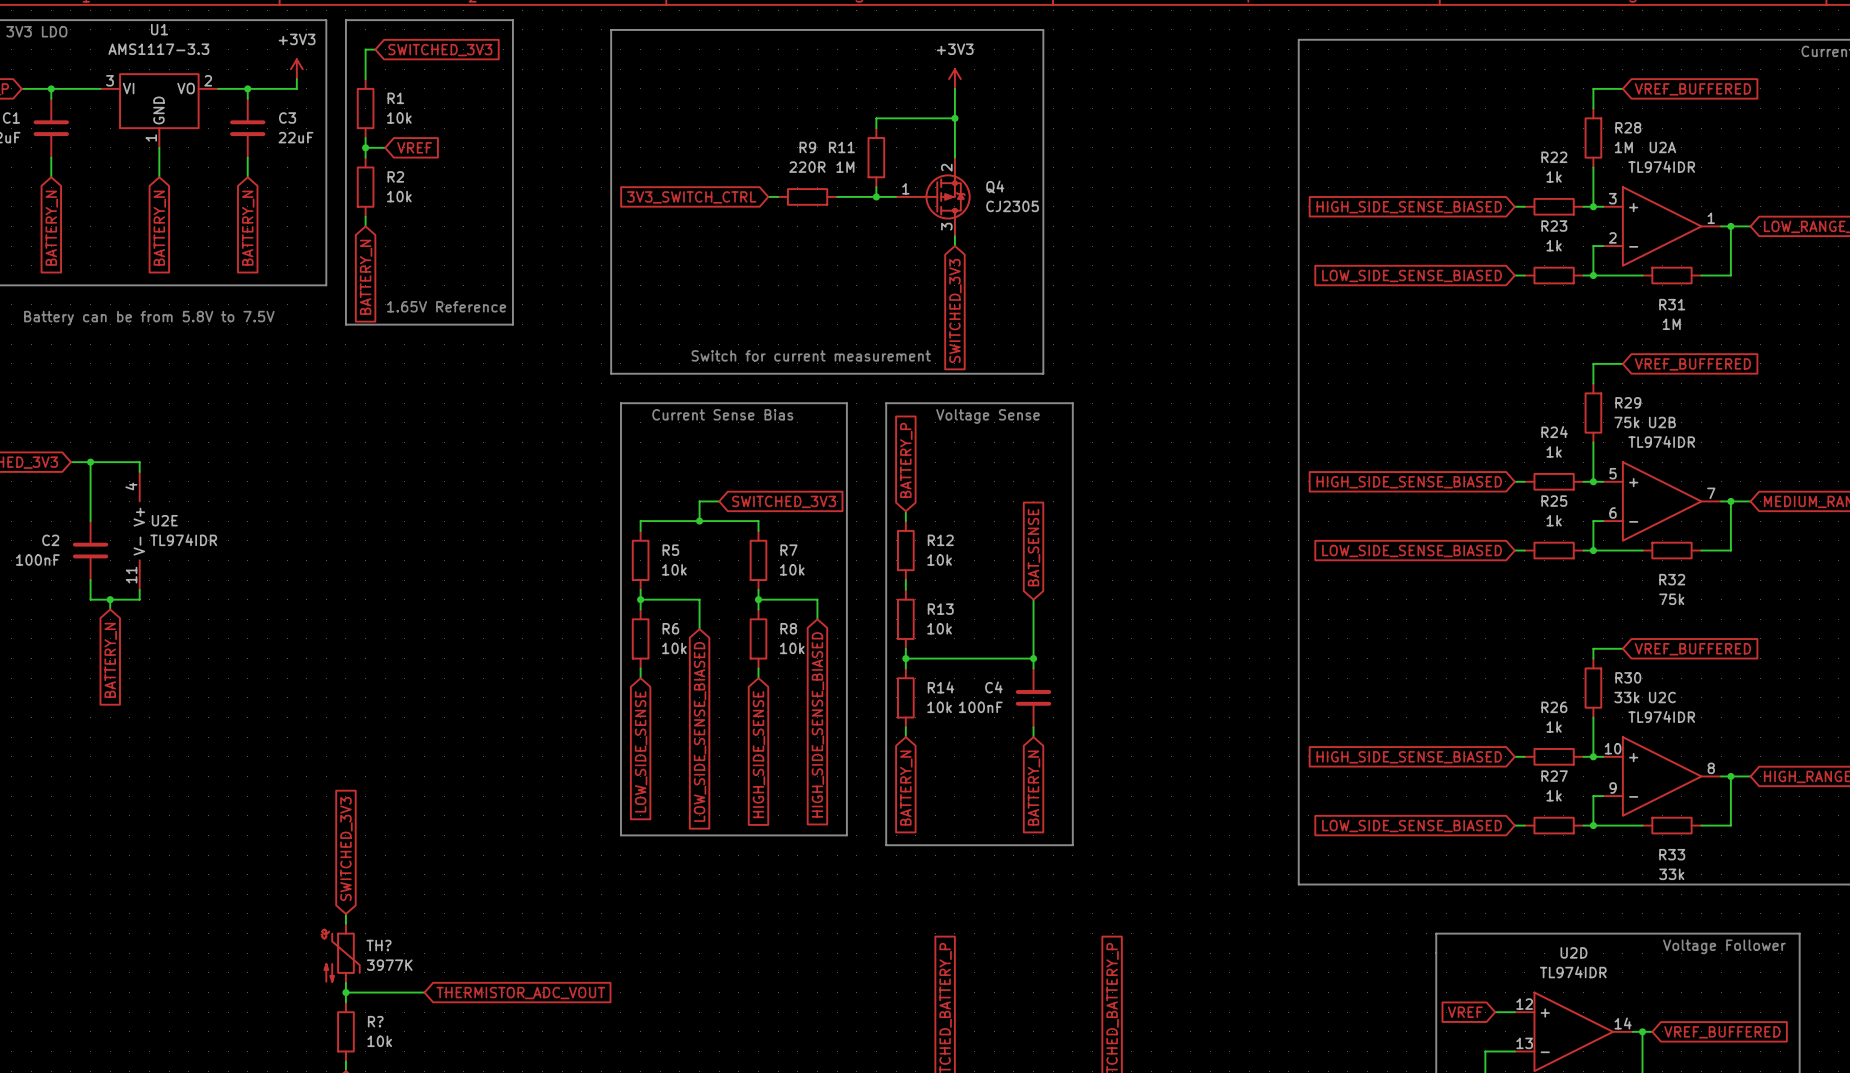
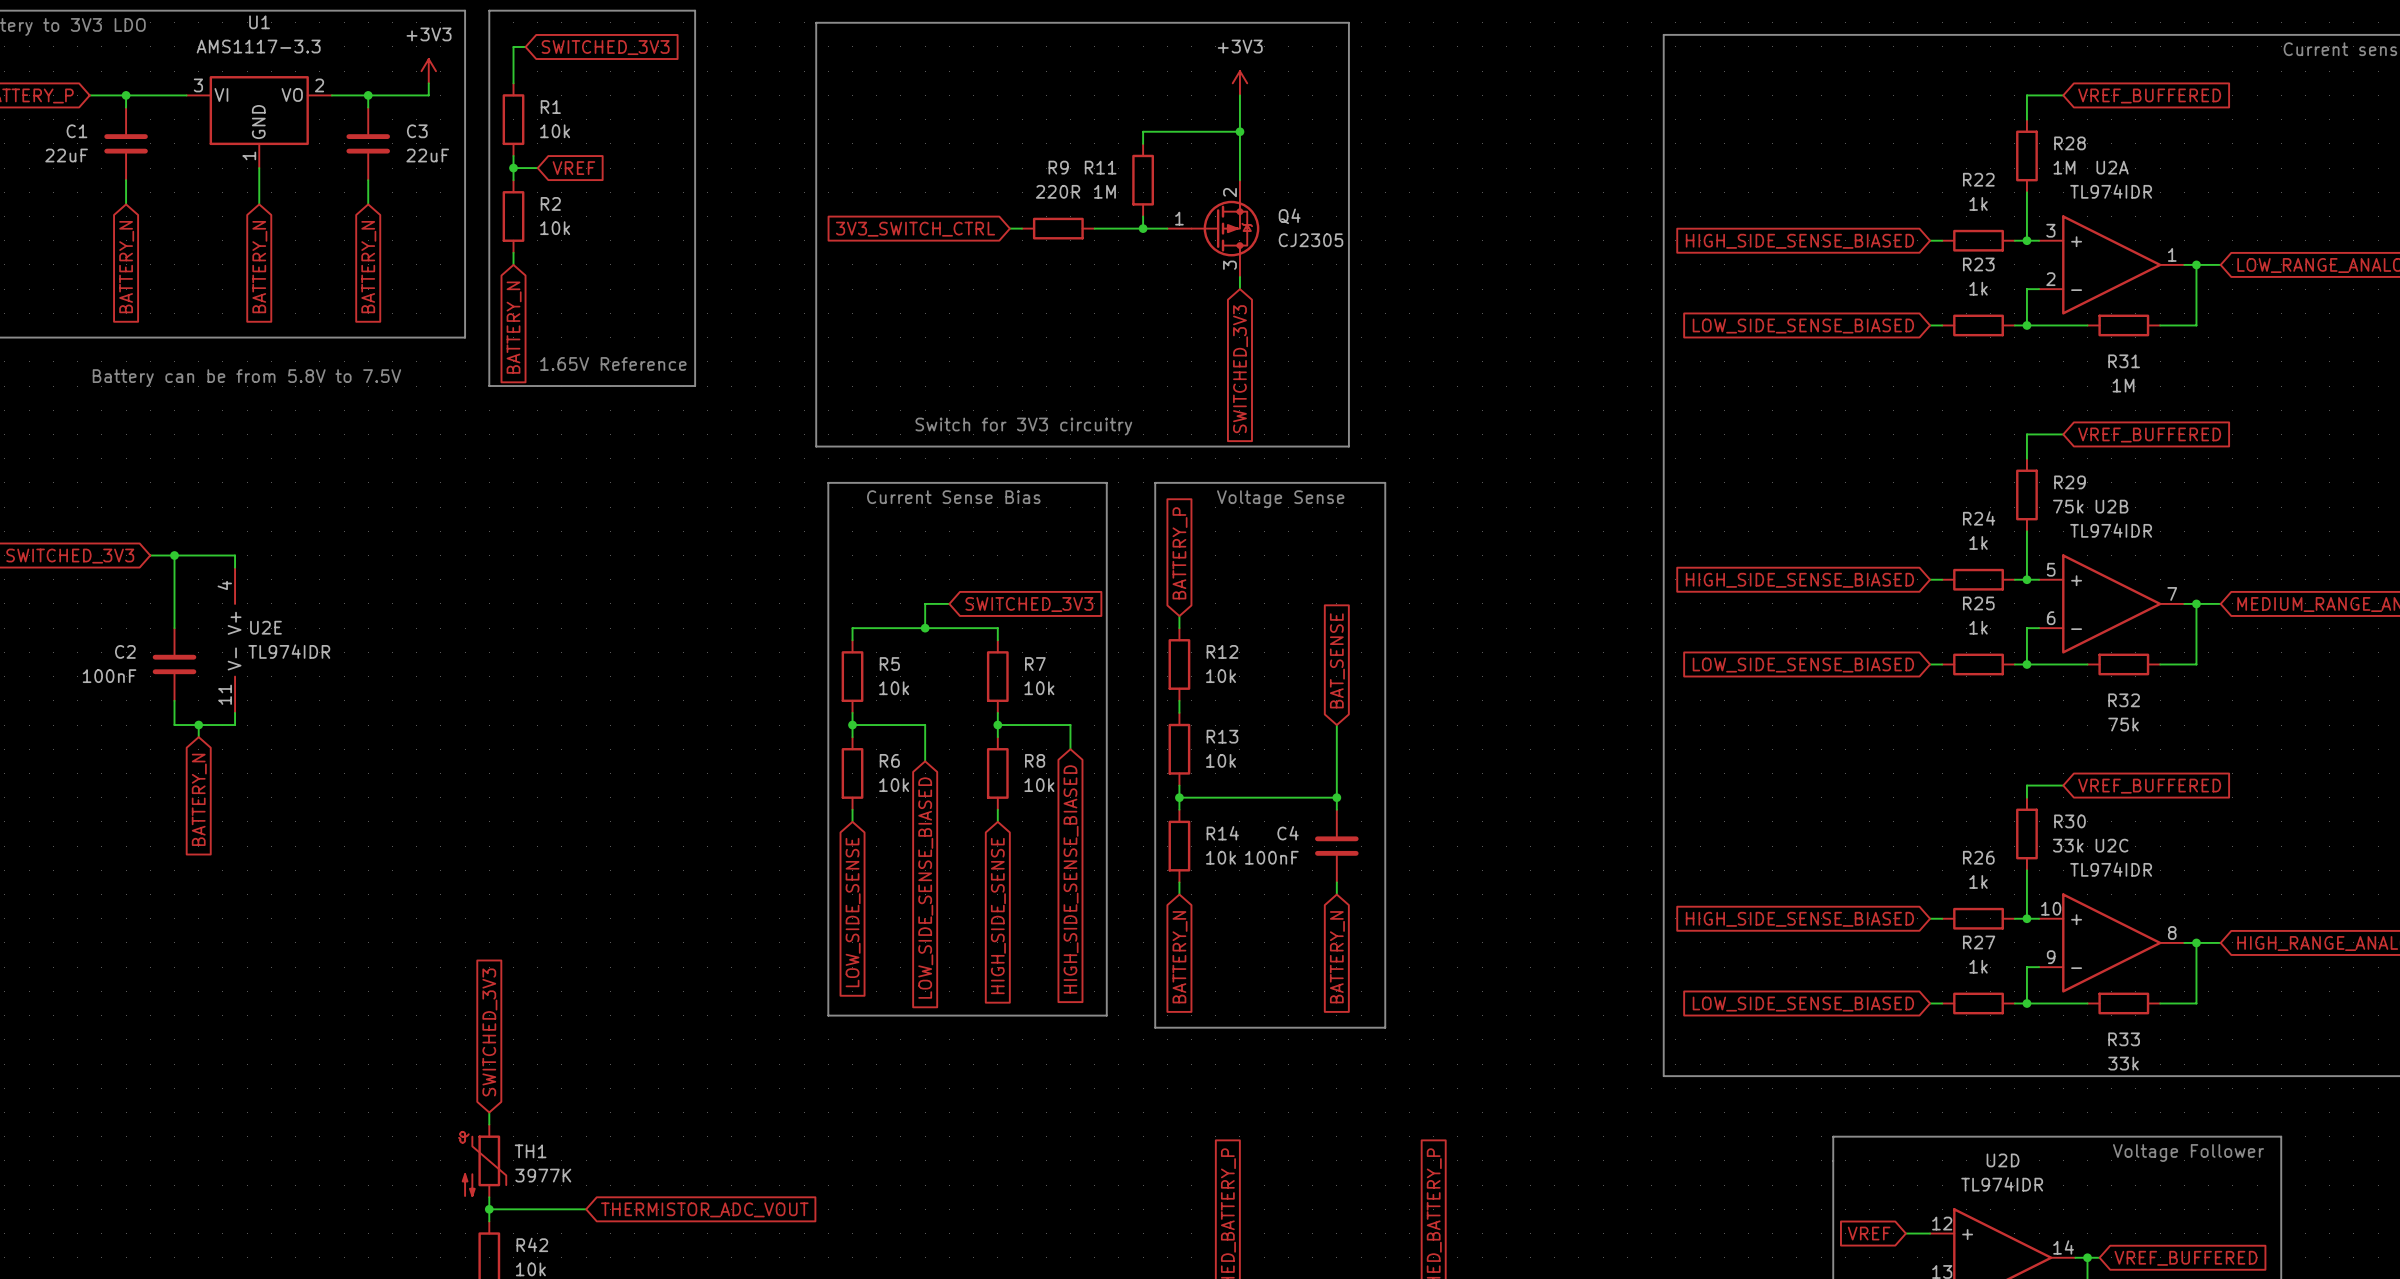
text: Switch for current measurement (811, 355) -> Switch for 3V3 circuitry (1023, 426)
TH? name: TH? (379, 945) -> TH1 (530, 1151)
R? name: R? (375, 1021) -> R42 (532, 1244)

